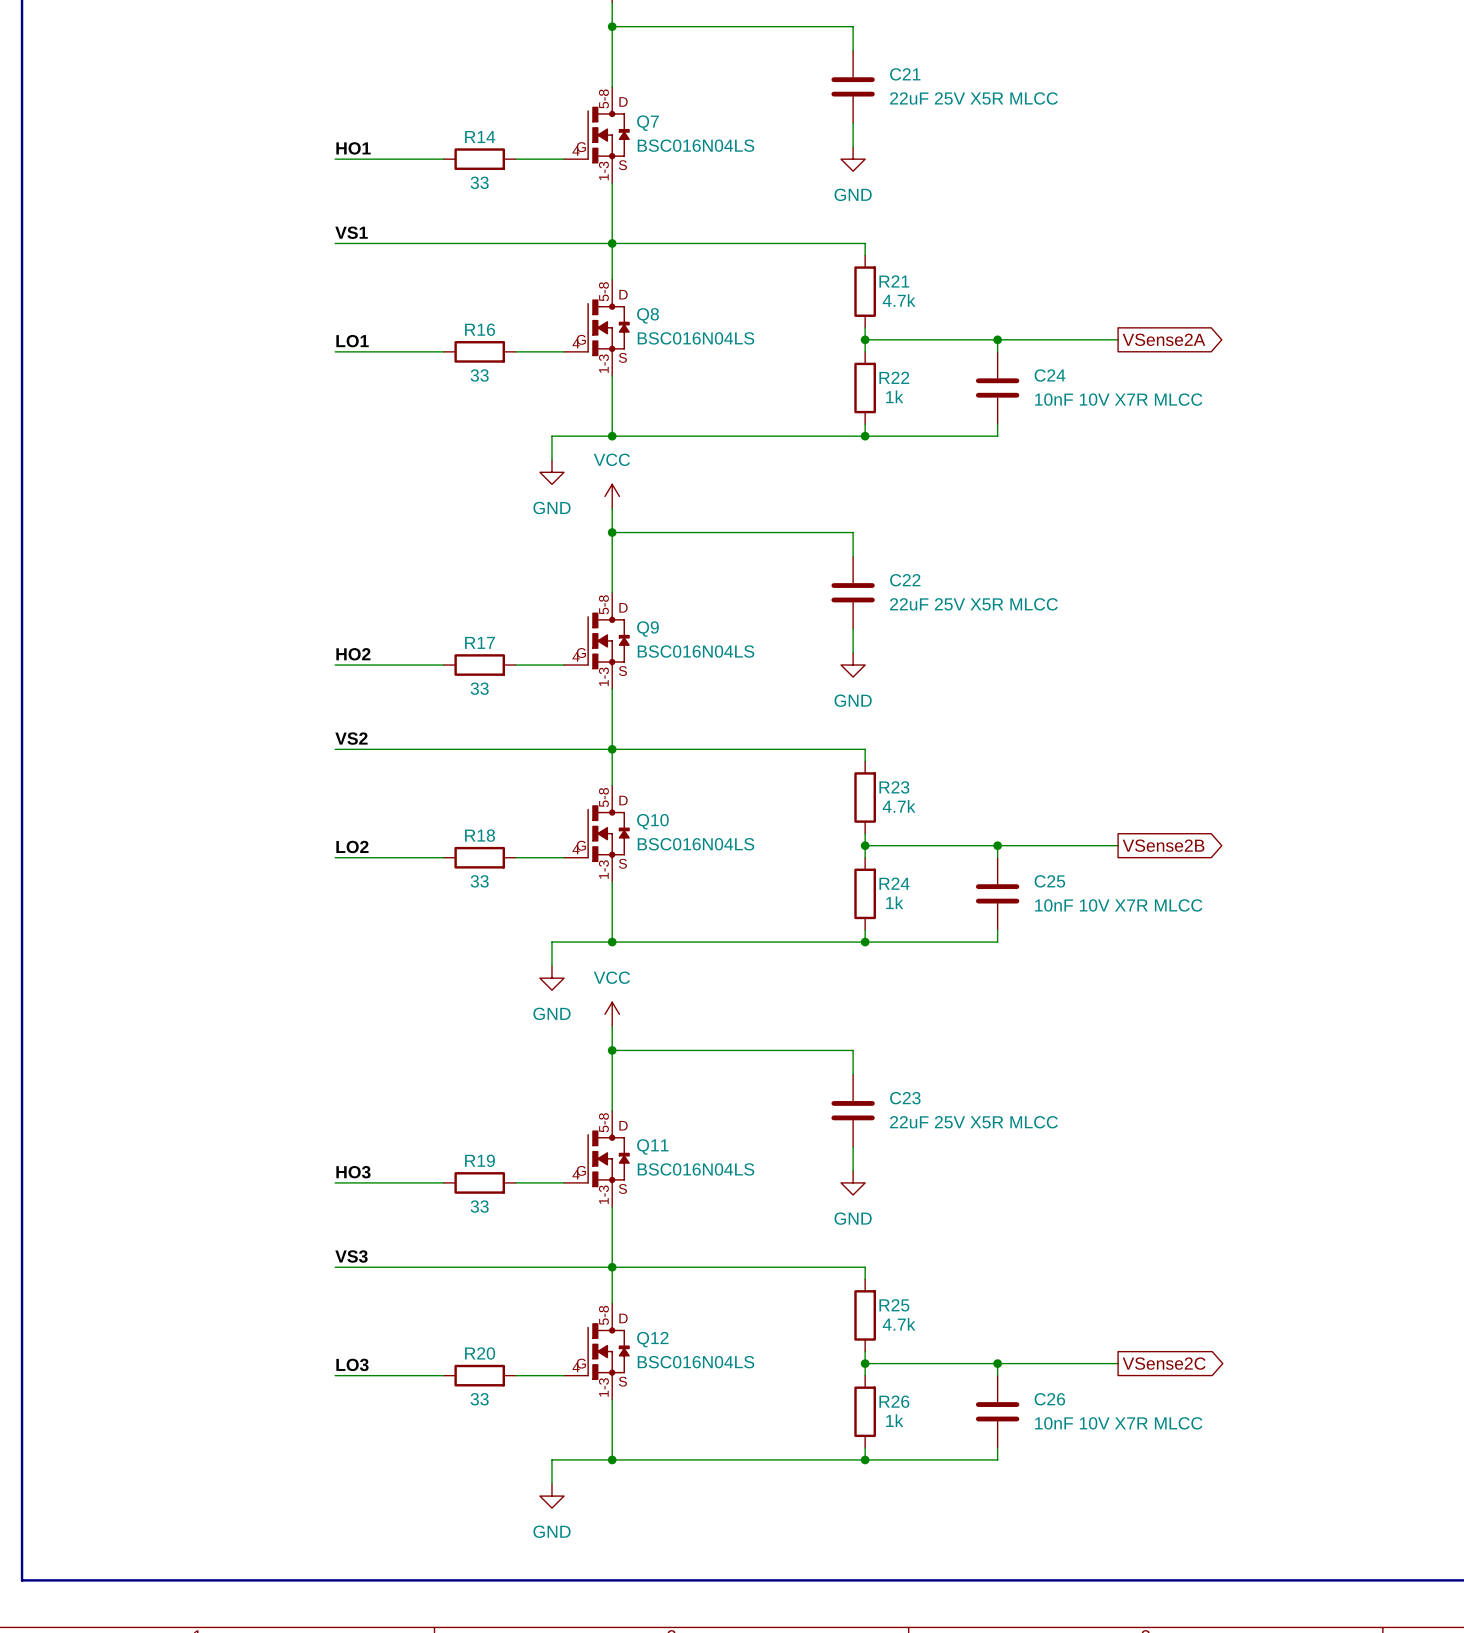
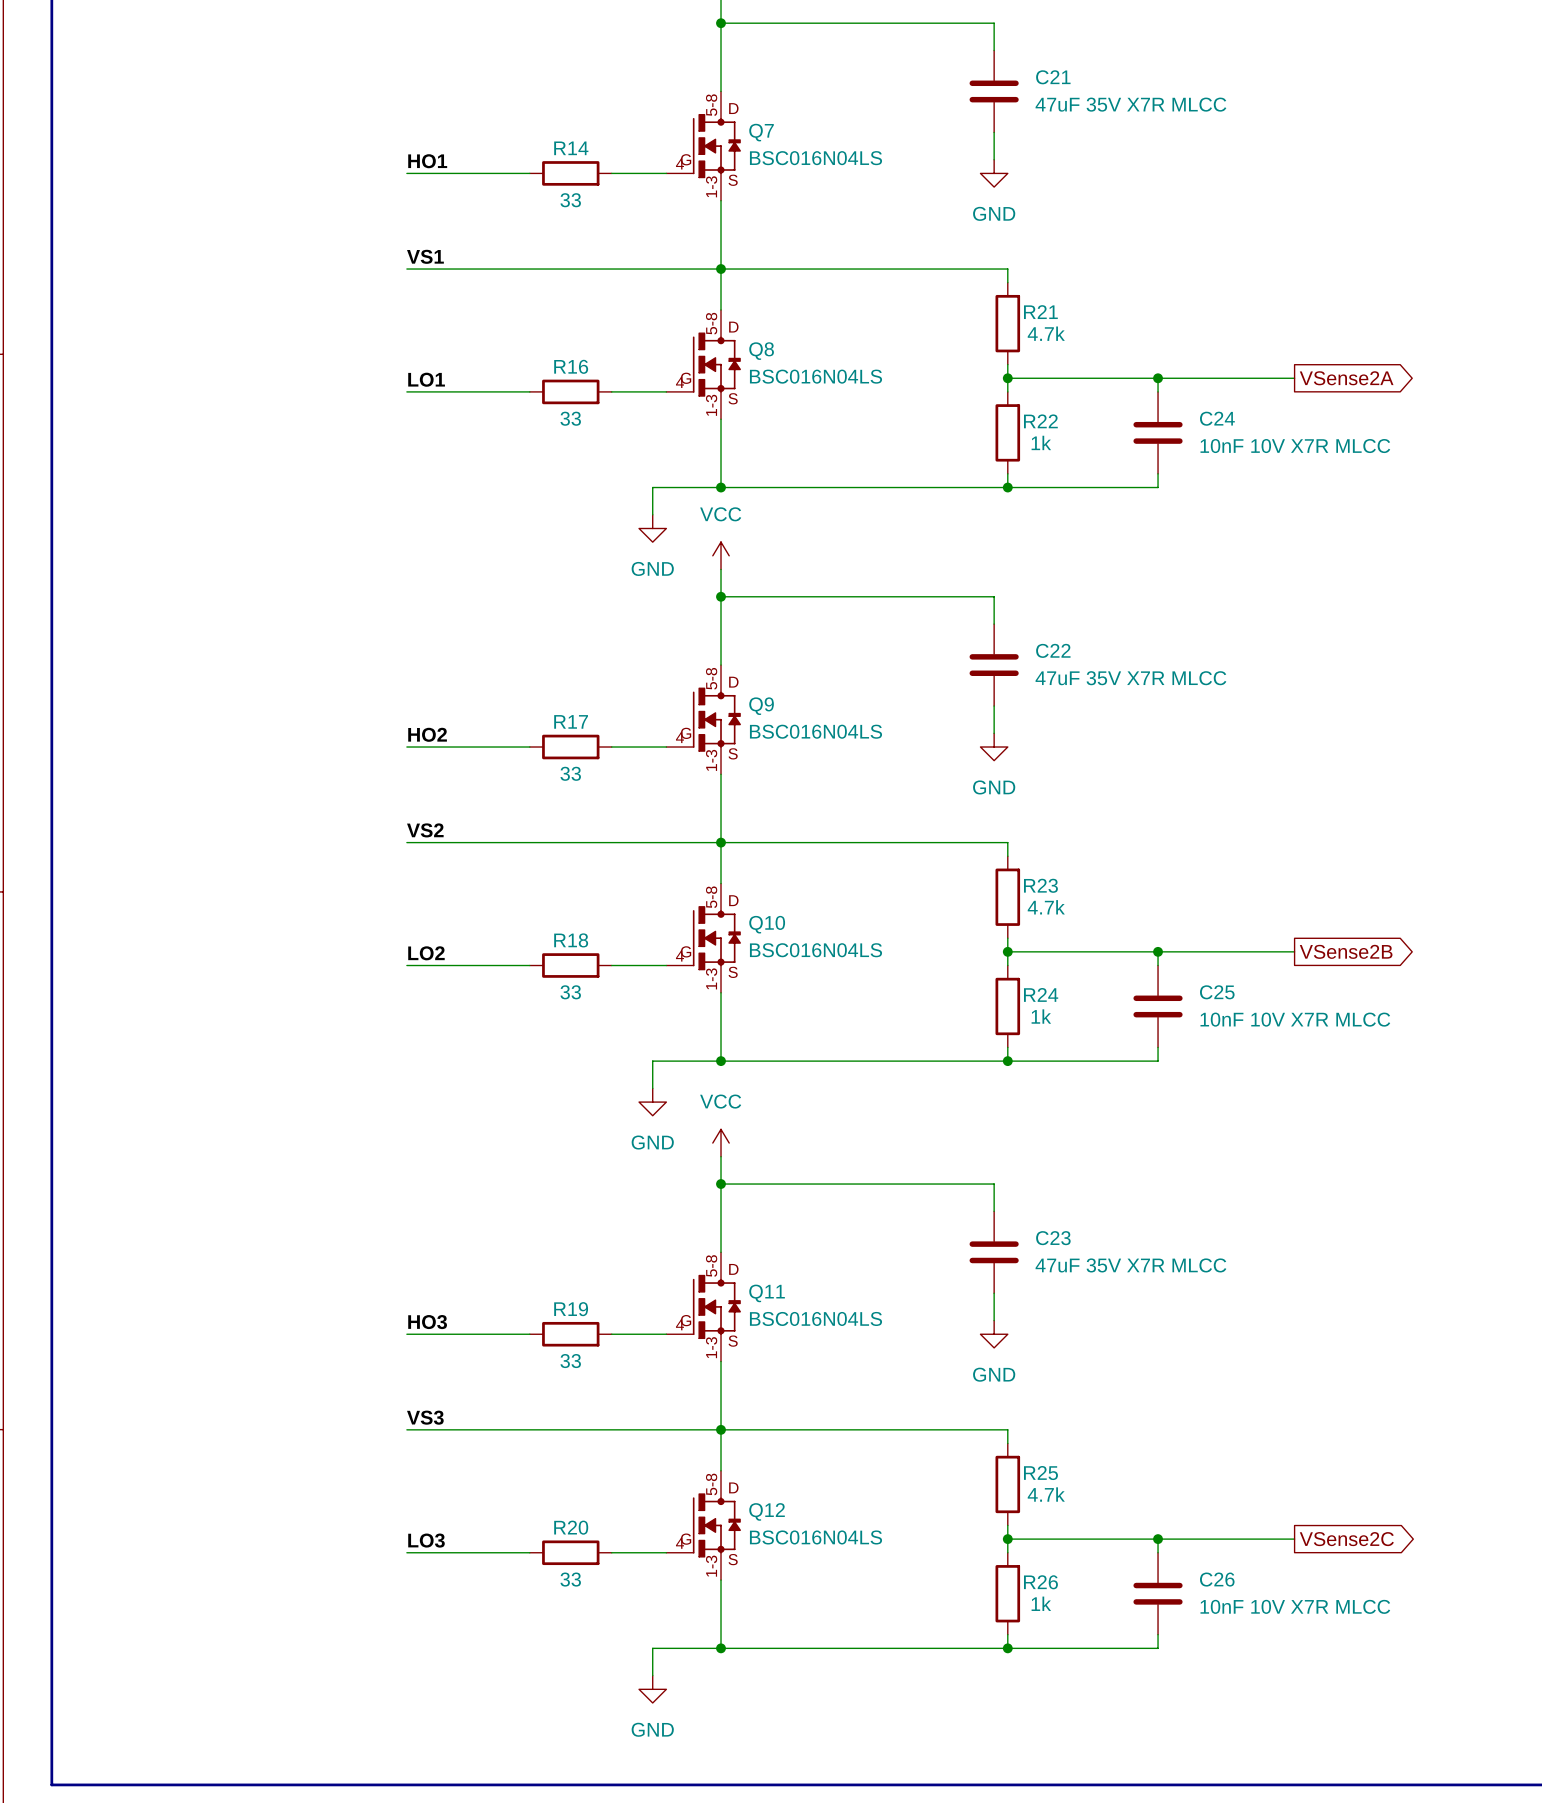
C21 value: 22uF 25V X5R MLCC (973, 98) -> 47uF 35V X7R MLCC (1130, 104)
C22 value: 22uF 25V X5R MLCC (973, 604) -> 47uF 35V X7R MLCC (1130, 678)
C23 value: 22uF 25V X5R MLCC (973, 1122) -> 47uF 35V X7R MLCC (1130, 1265)

